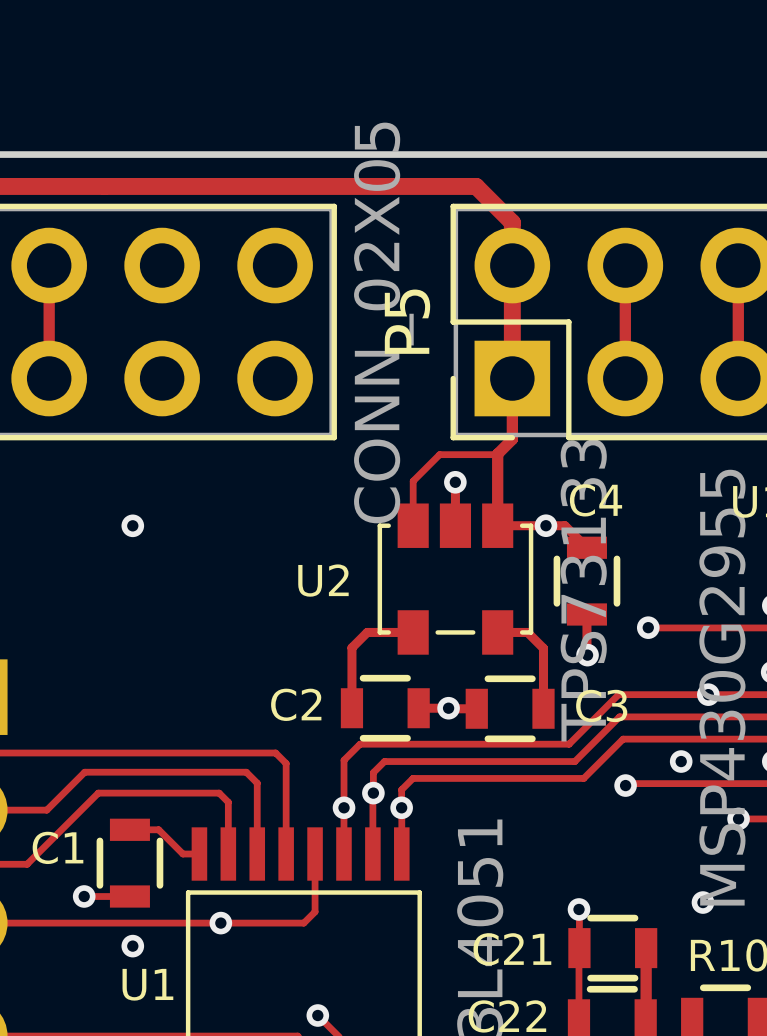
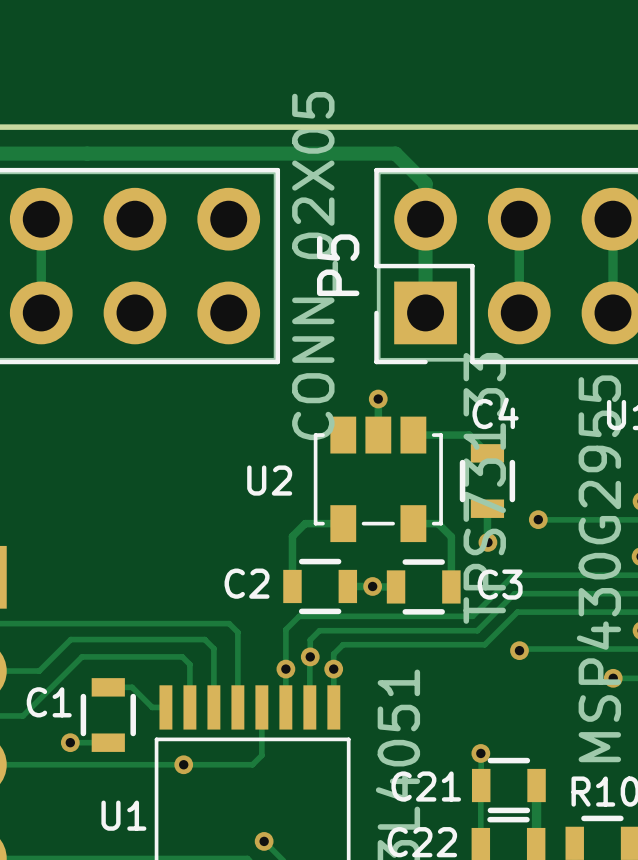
track: (512, 378) (512, 439) (497, 454) (497, 525) -> none
track: (497, 454) (439, 454) (413, 481) (413, 525) -> none
via: (132, 525) -> none
via: (545, 525) -> none
via: (708, 694) -> none
via: (681, 761) -> none
via: (702, 902) -> none
via: (132, 946) -> none

